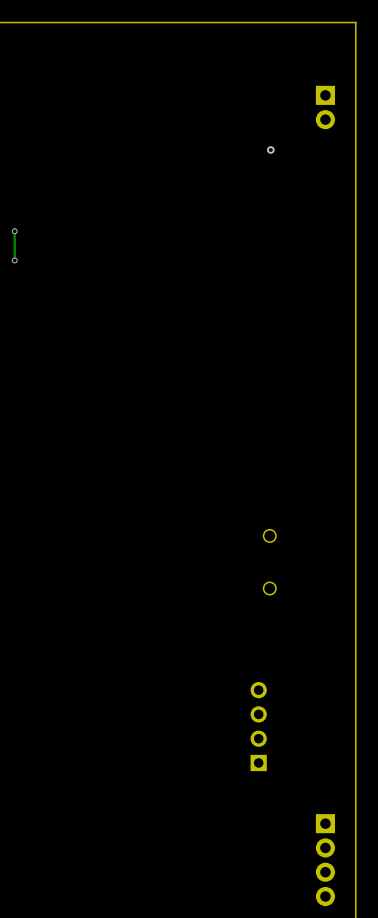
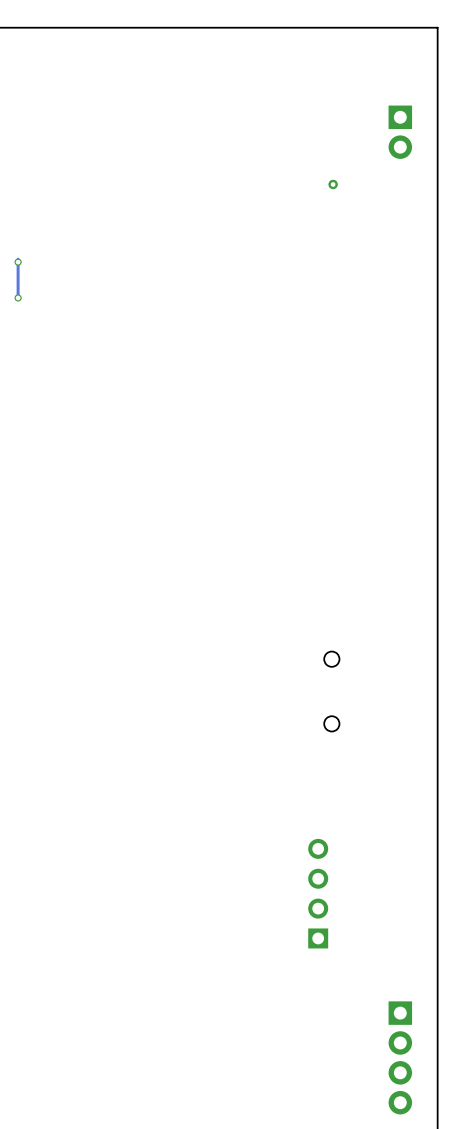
via: none -> (18, 262)
via: (14, 231) -> none
via: none -> (18, 297)
track: (14, 243) (14, 261) -> (18, 259) (18, 281)
via: (14, 260) -> none

